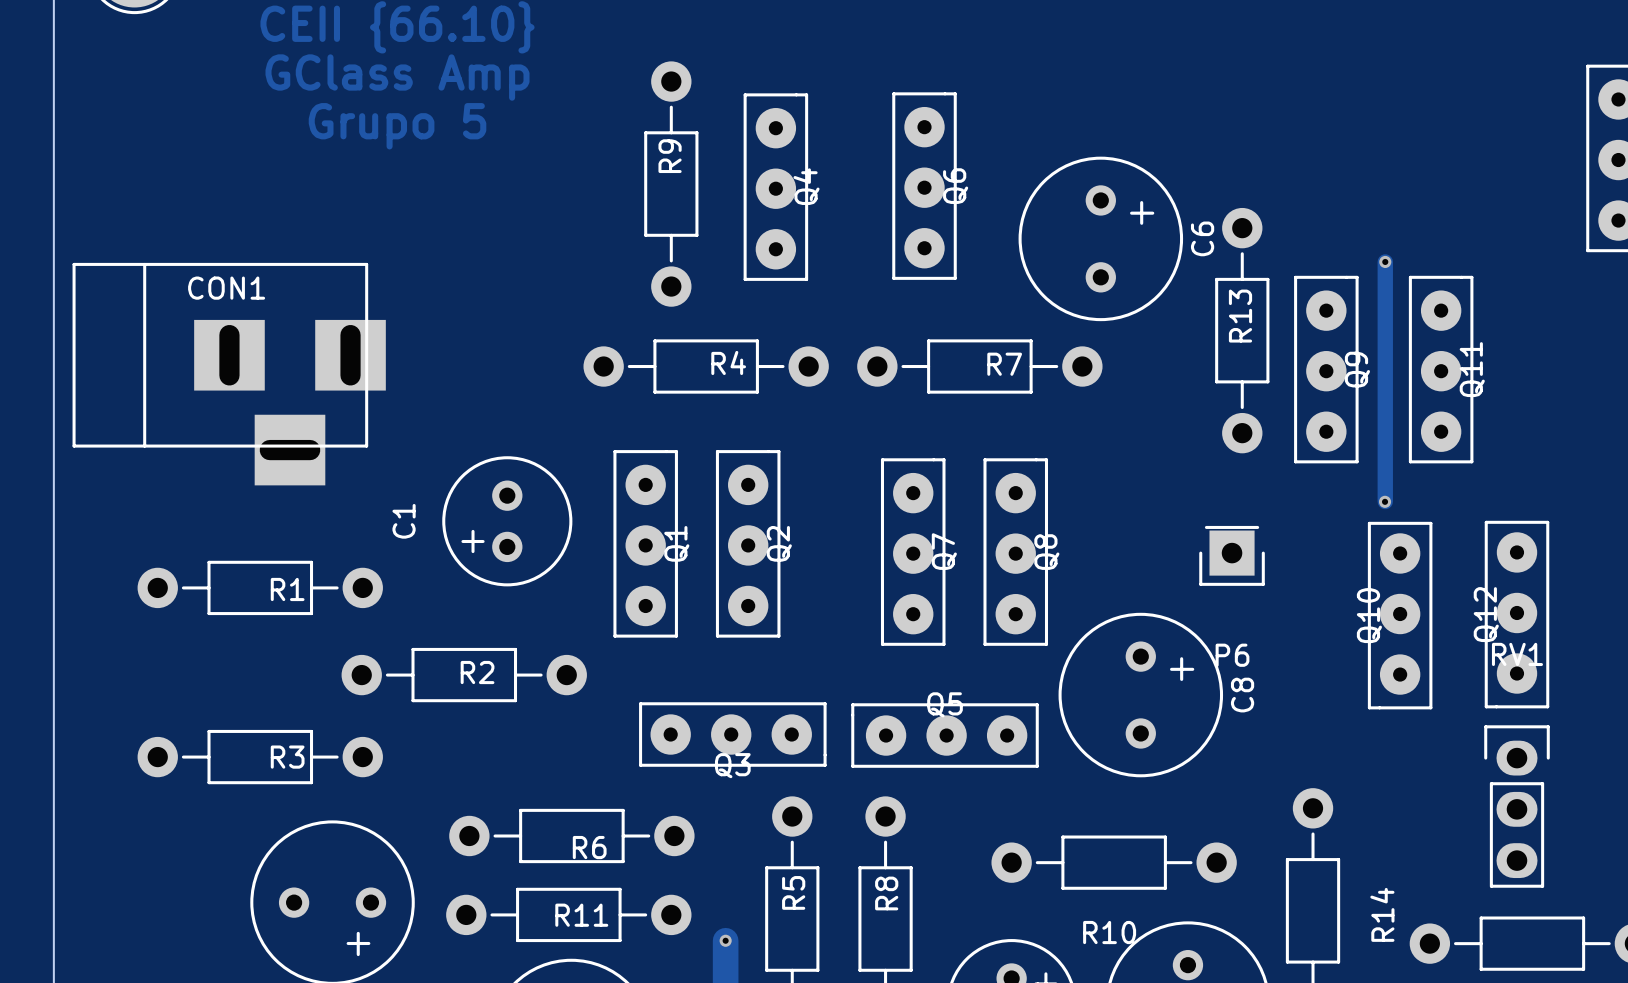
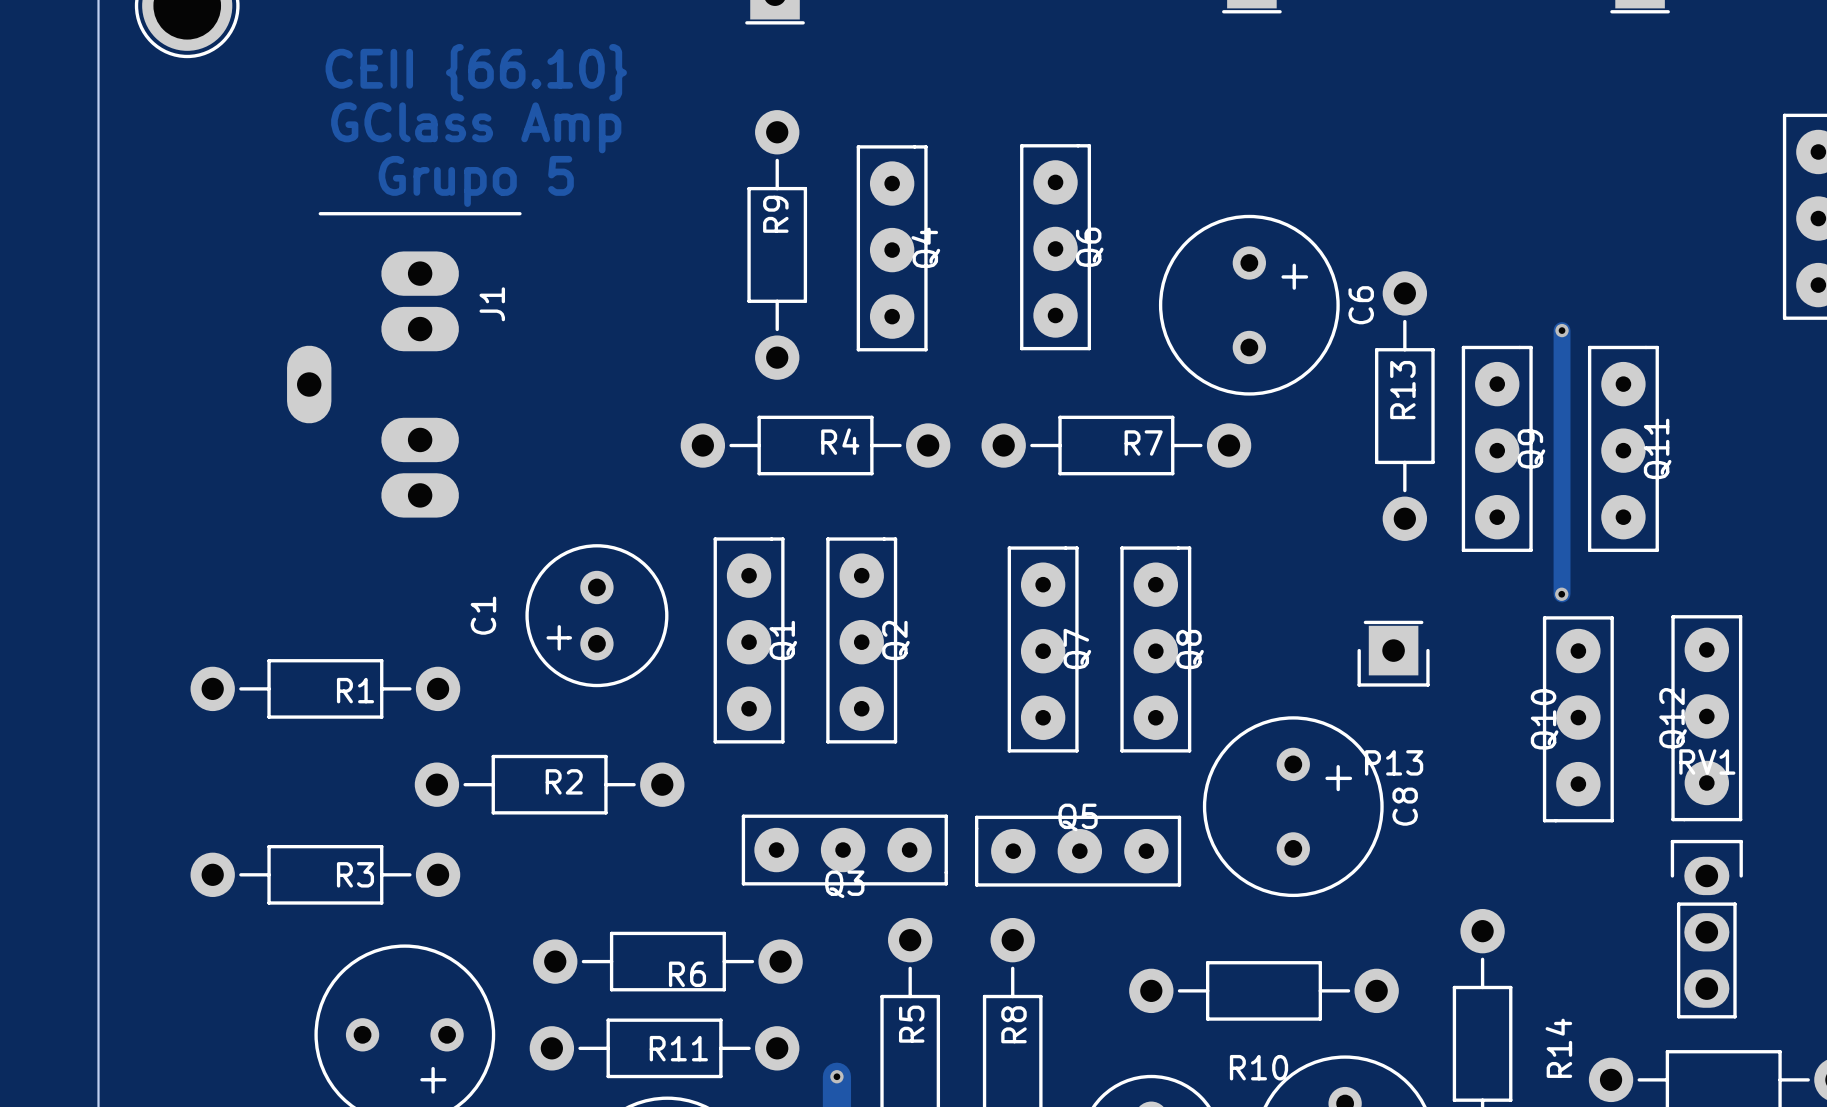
J1: none -> (404, 364)
CON1: (229, 374) -> none
P6 name: P6 (1232, 655) -> P13 (1394, 762)

